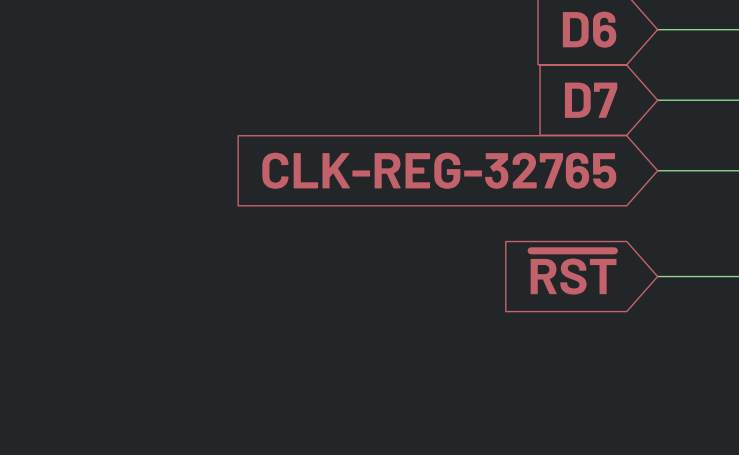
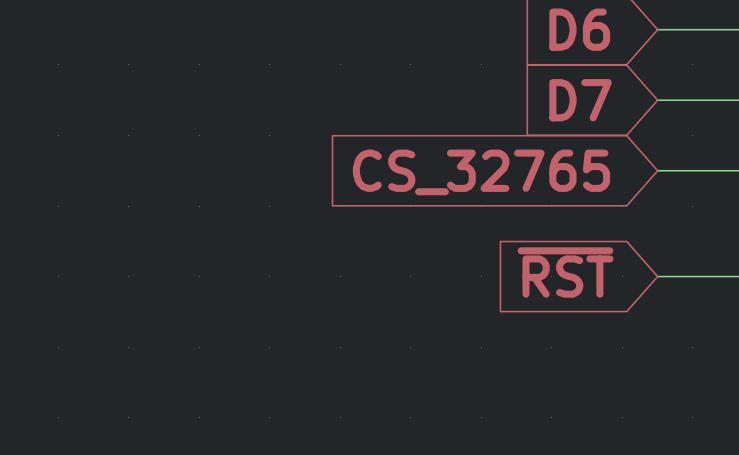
global label: CLK-REG-32765 (439, 170) -> CS_32765 (481, 172)

